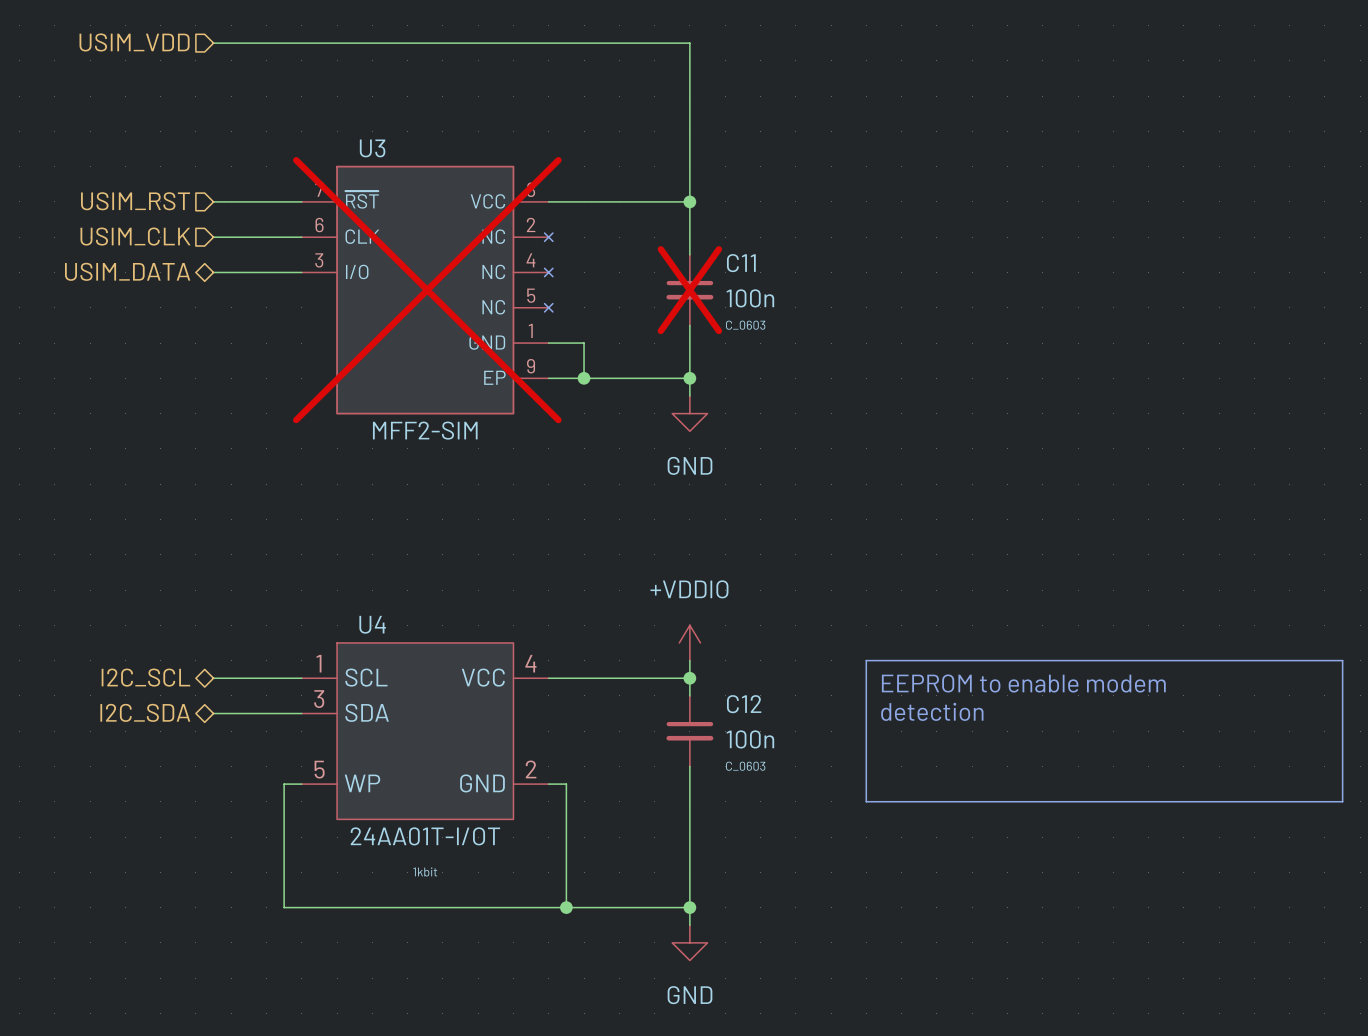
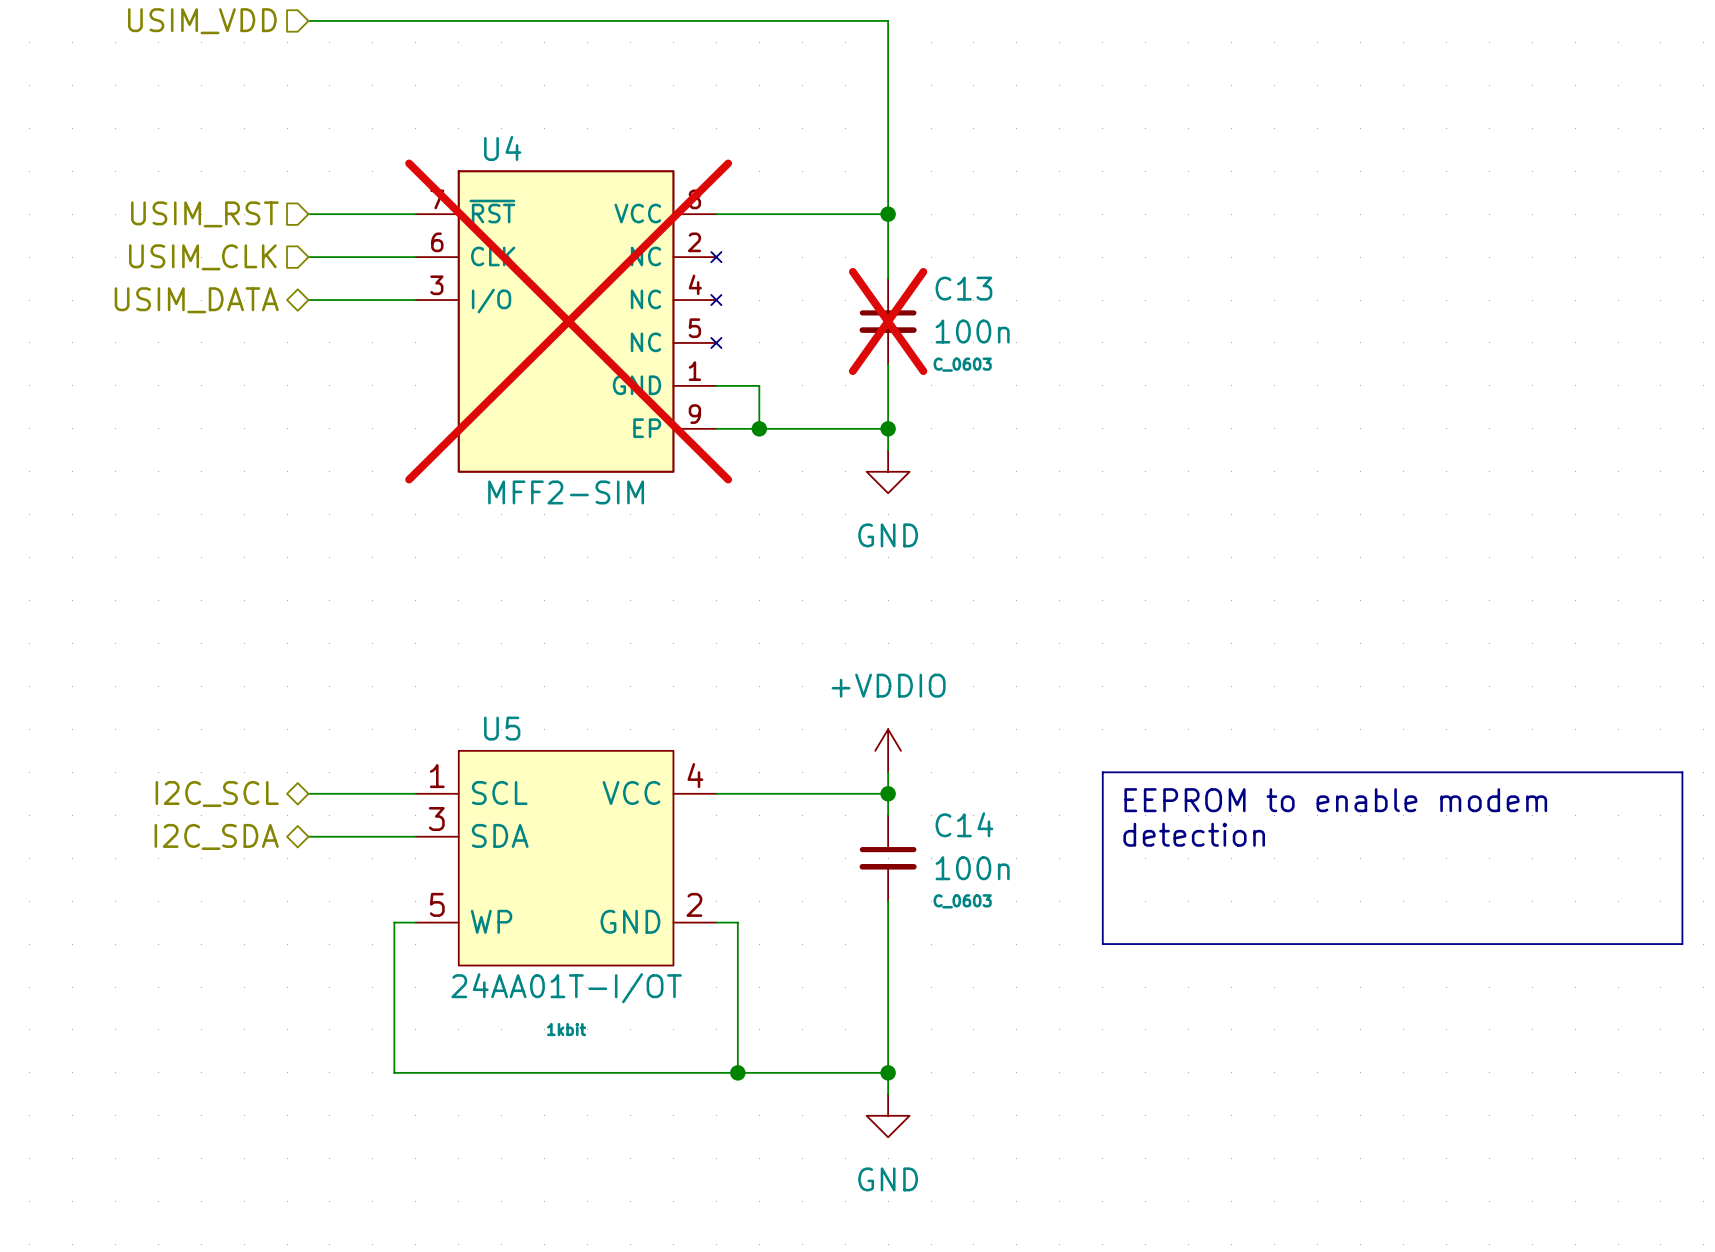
U3 name: U3 (372, 148) -> U4 (502, 148)
C11 name: C11 (741, 263) -> C13 (963, 288)
U4 name: U4 (372, 624) -> U5 (502, 728)
C12 name: C12 (744, 704) -> C14 (964, 824)

